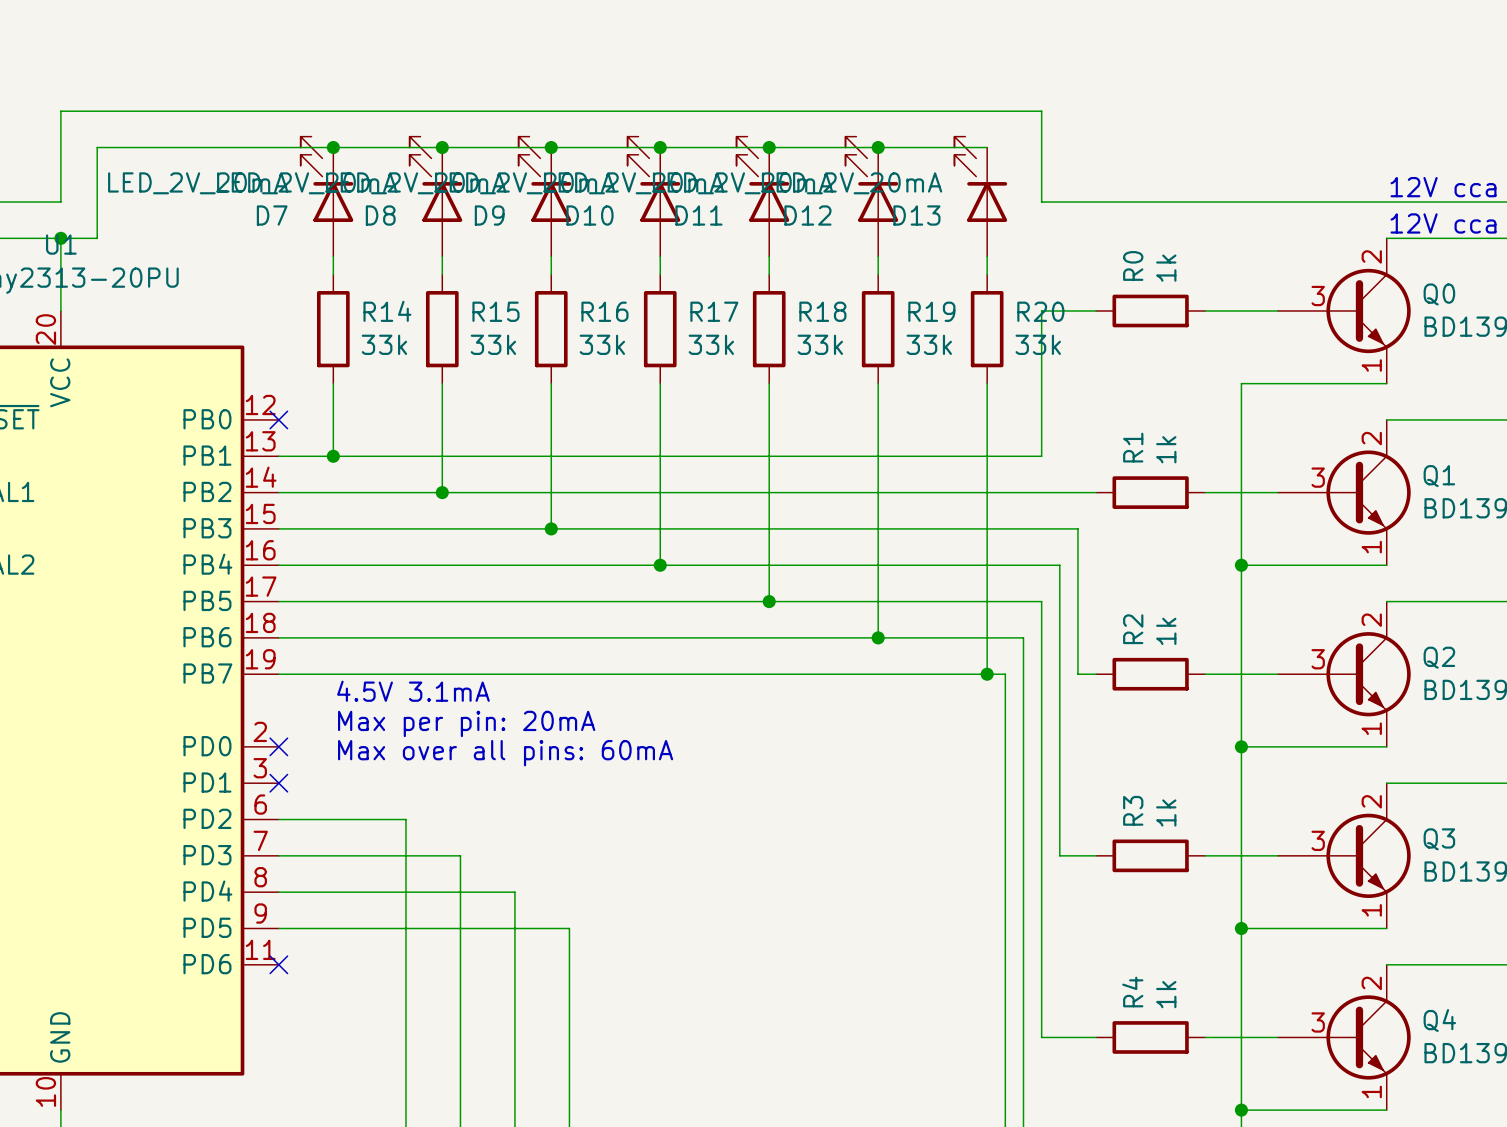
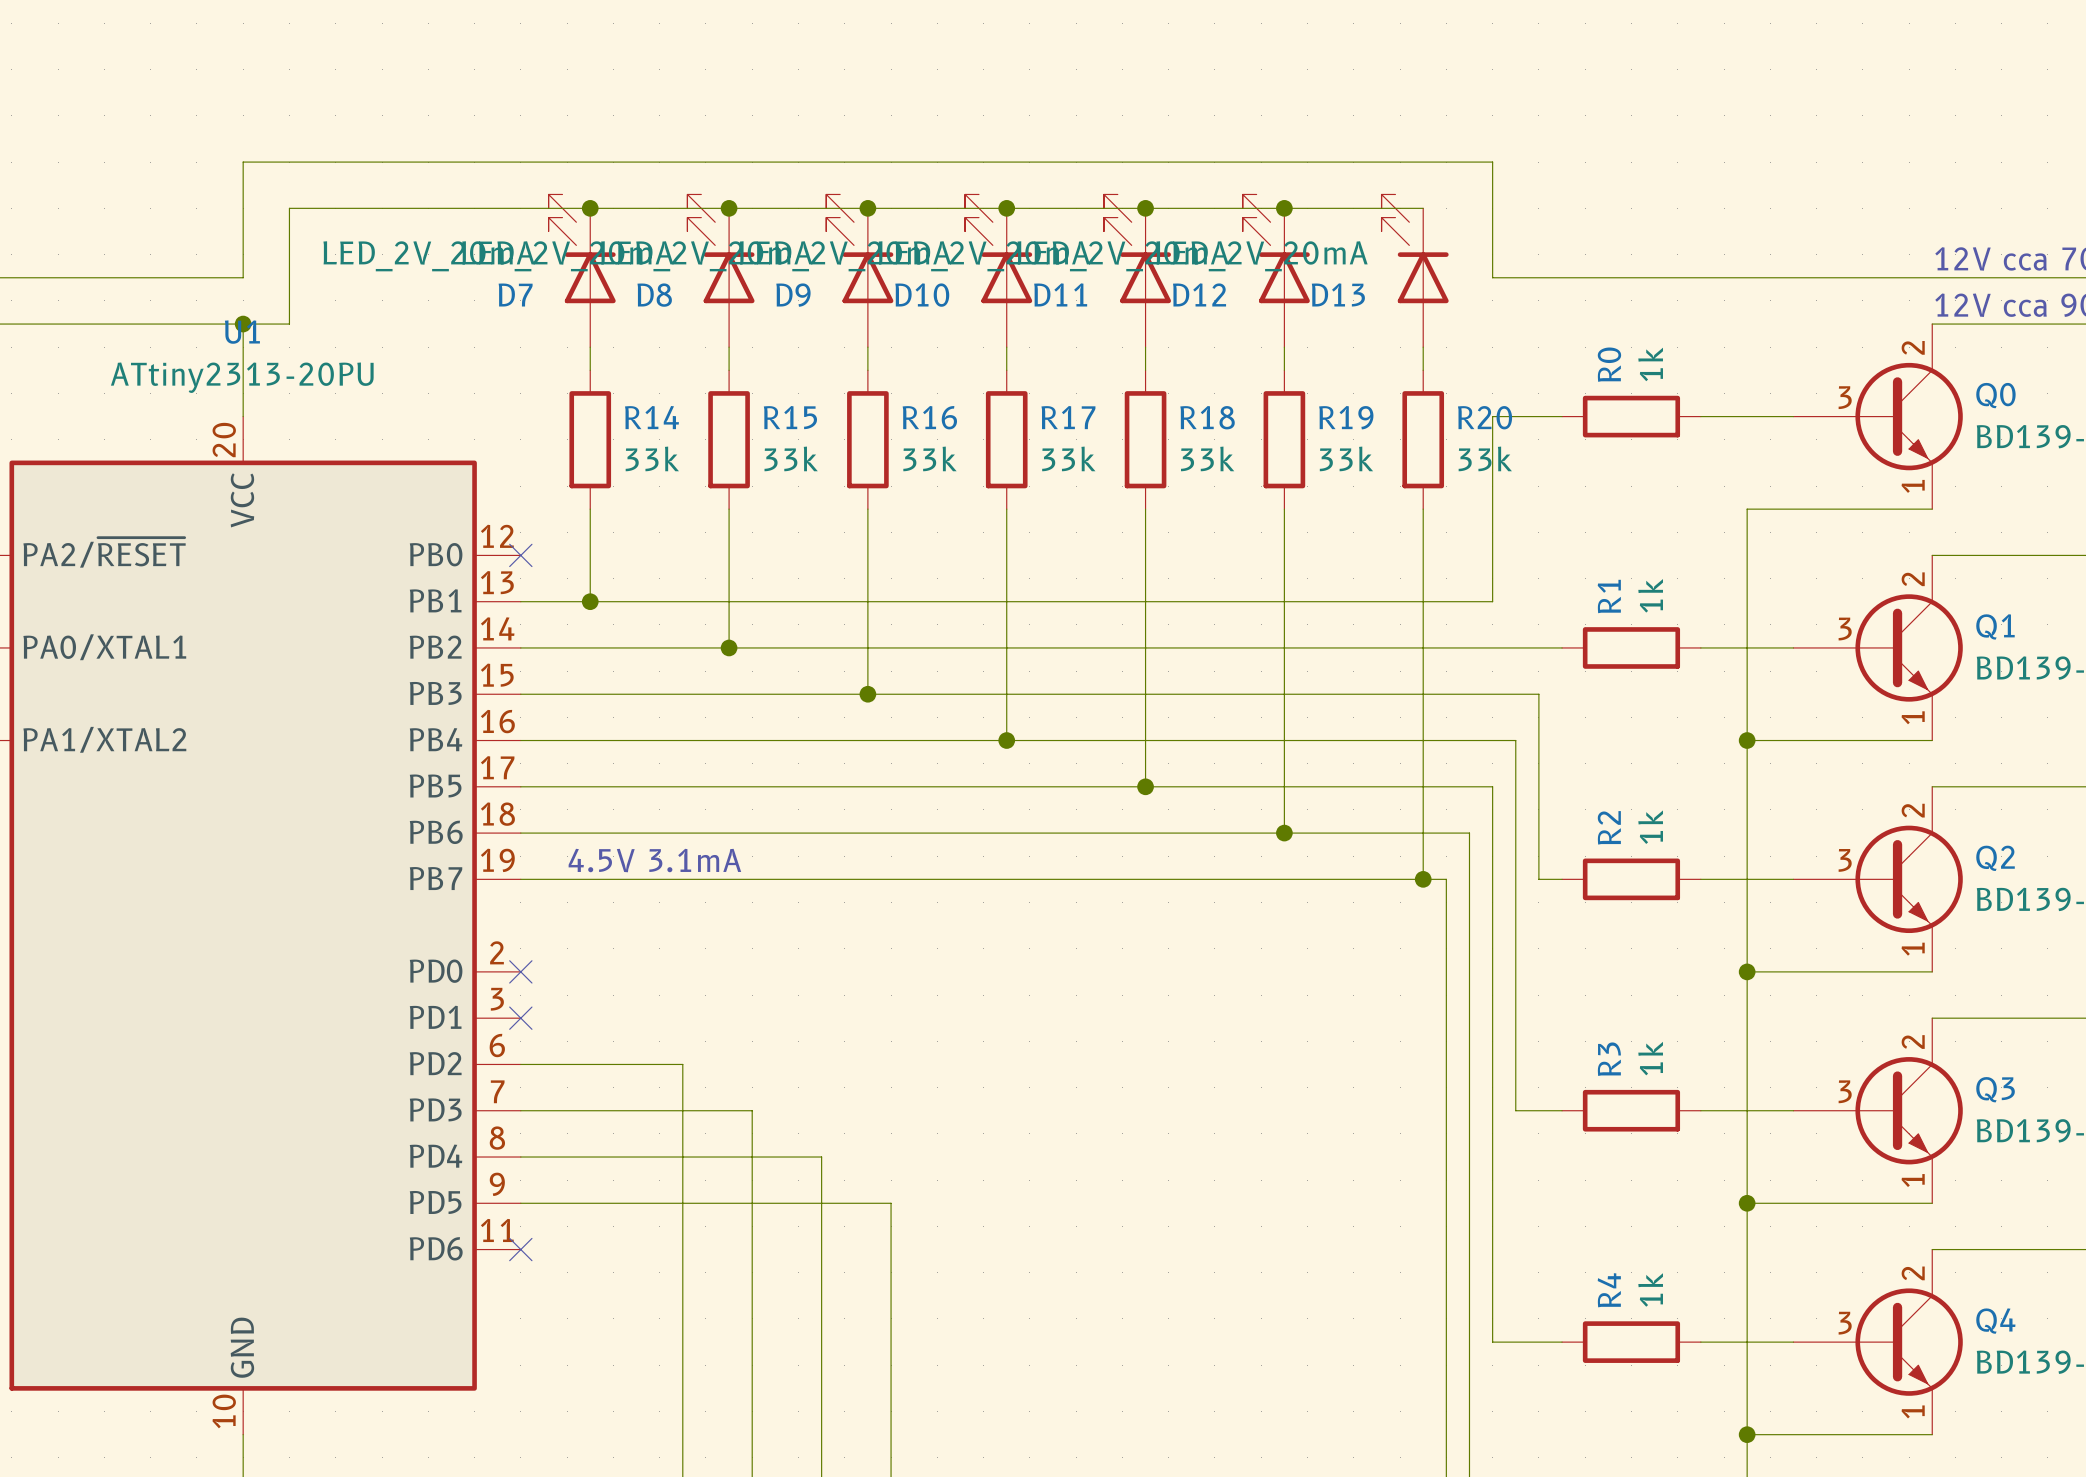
text position: 4.5V 3.1mA (413, 691) -> 4.5V 3.1mA (654, 860)
text: Max per pin: 20mA (466, 723) -> none
text: Max over all pins: 60mA (505, 753) -> none

